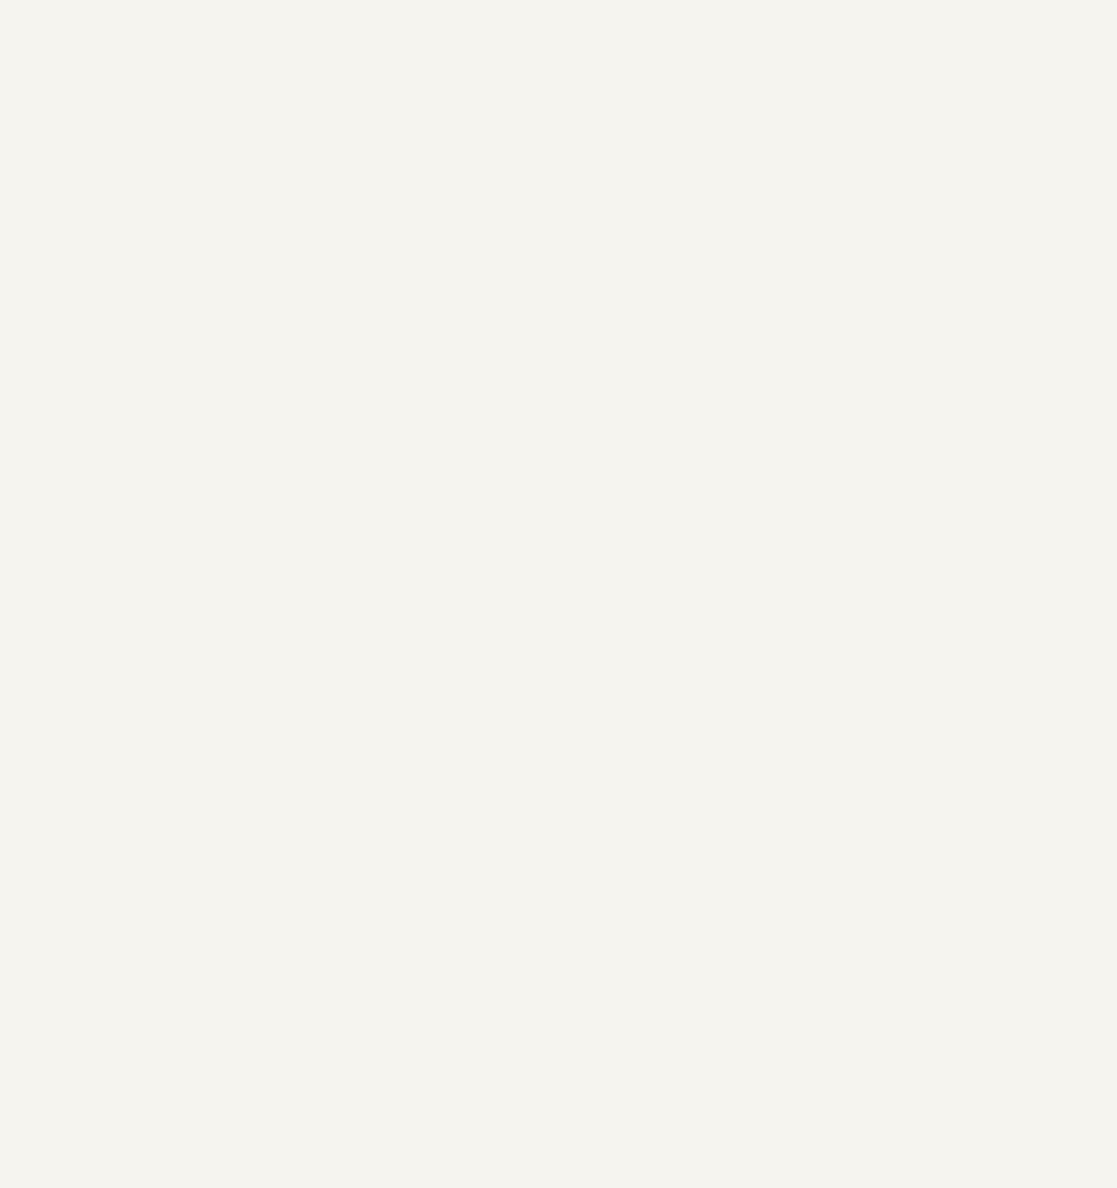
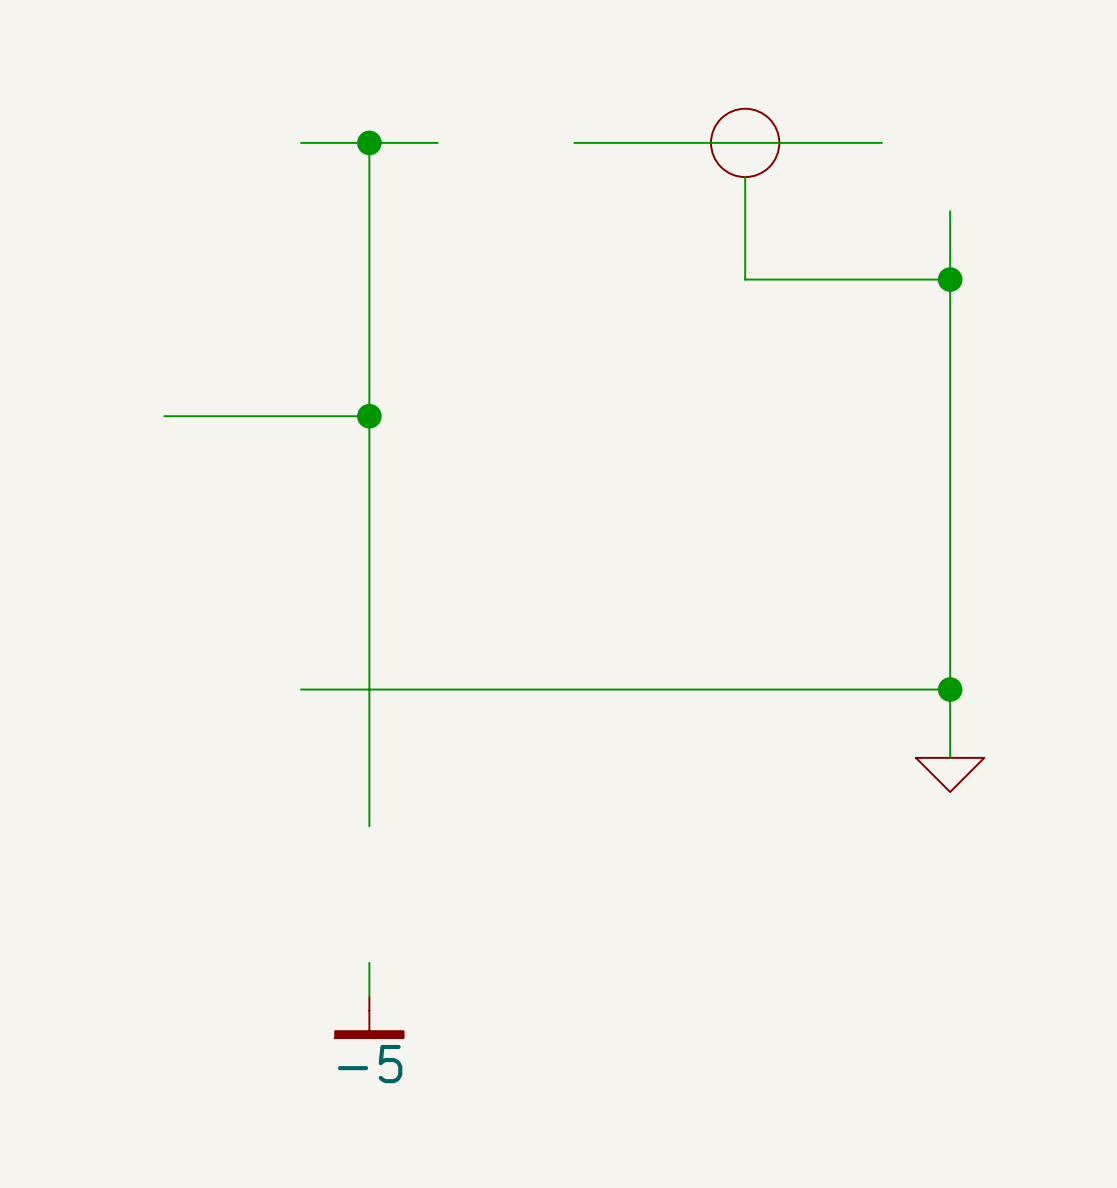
wire: none -> (301, 142) (437, 142)
wire: none -> (369, 142) (369, 826)
junction: none -> (369, 142)
wire: none -> (574, 142) (881, 142)
power symbol: none -> (745, 142)
wire: none -> (745, 177) (745, 279) (950, 279)
wire: none -> (950, 211) (950, 757)
junction: none -> (950, 279)
wire: none -> (164, 416) (369, 416)
junction: none -> (369, 416)
wire: none -> (301, 689) (950, 689)
junction: none -> (950, 689)
power symbol: none -> (950, 774)
wire: none -> (369, 962) (369, 997)
power symbol: none -> -5 (369, 1017)

